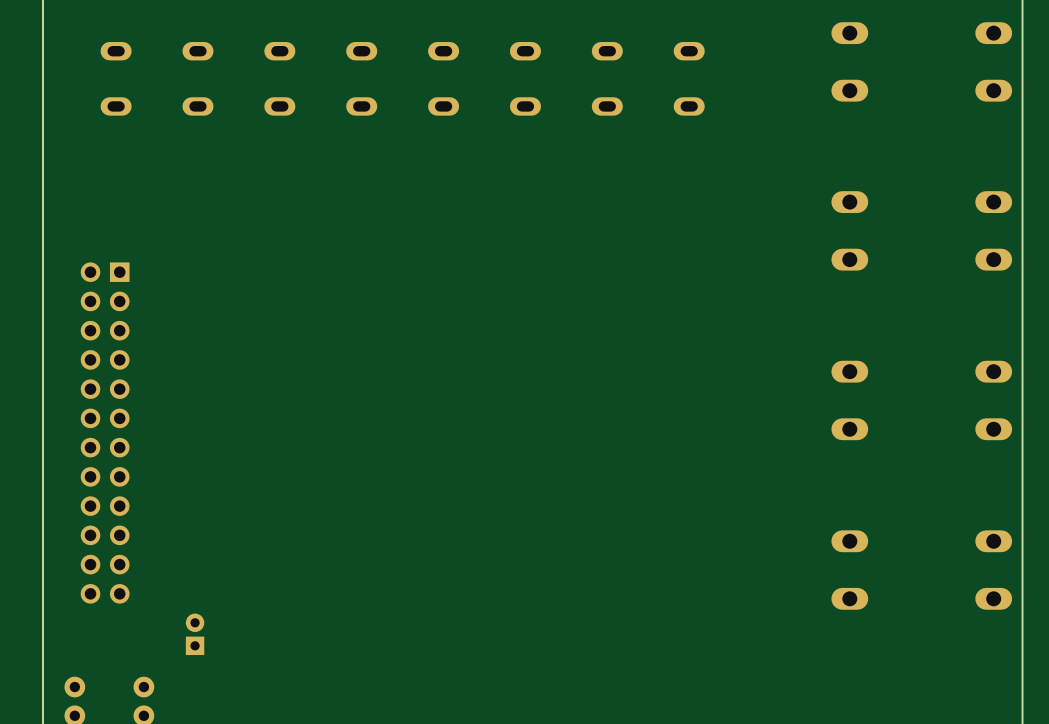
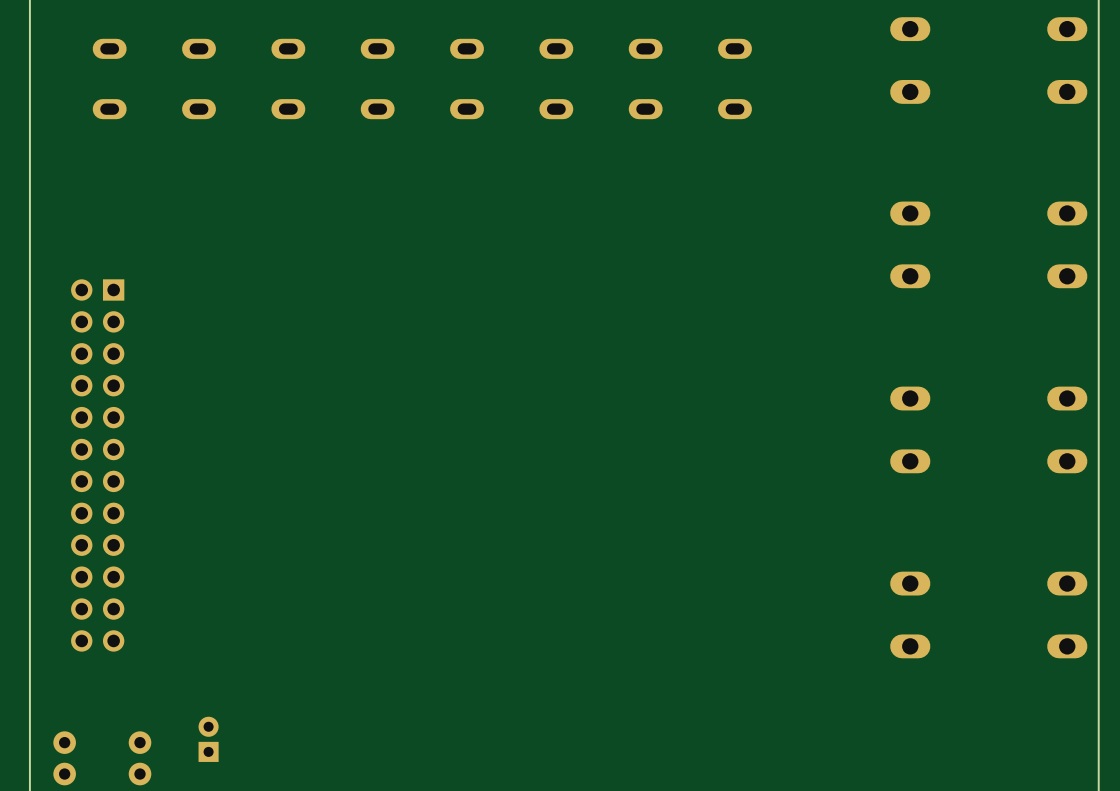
part position: (195, 634) -> (208, 739)

